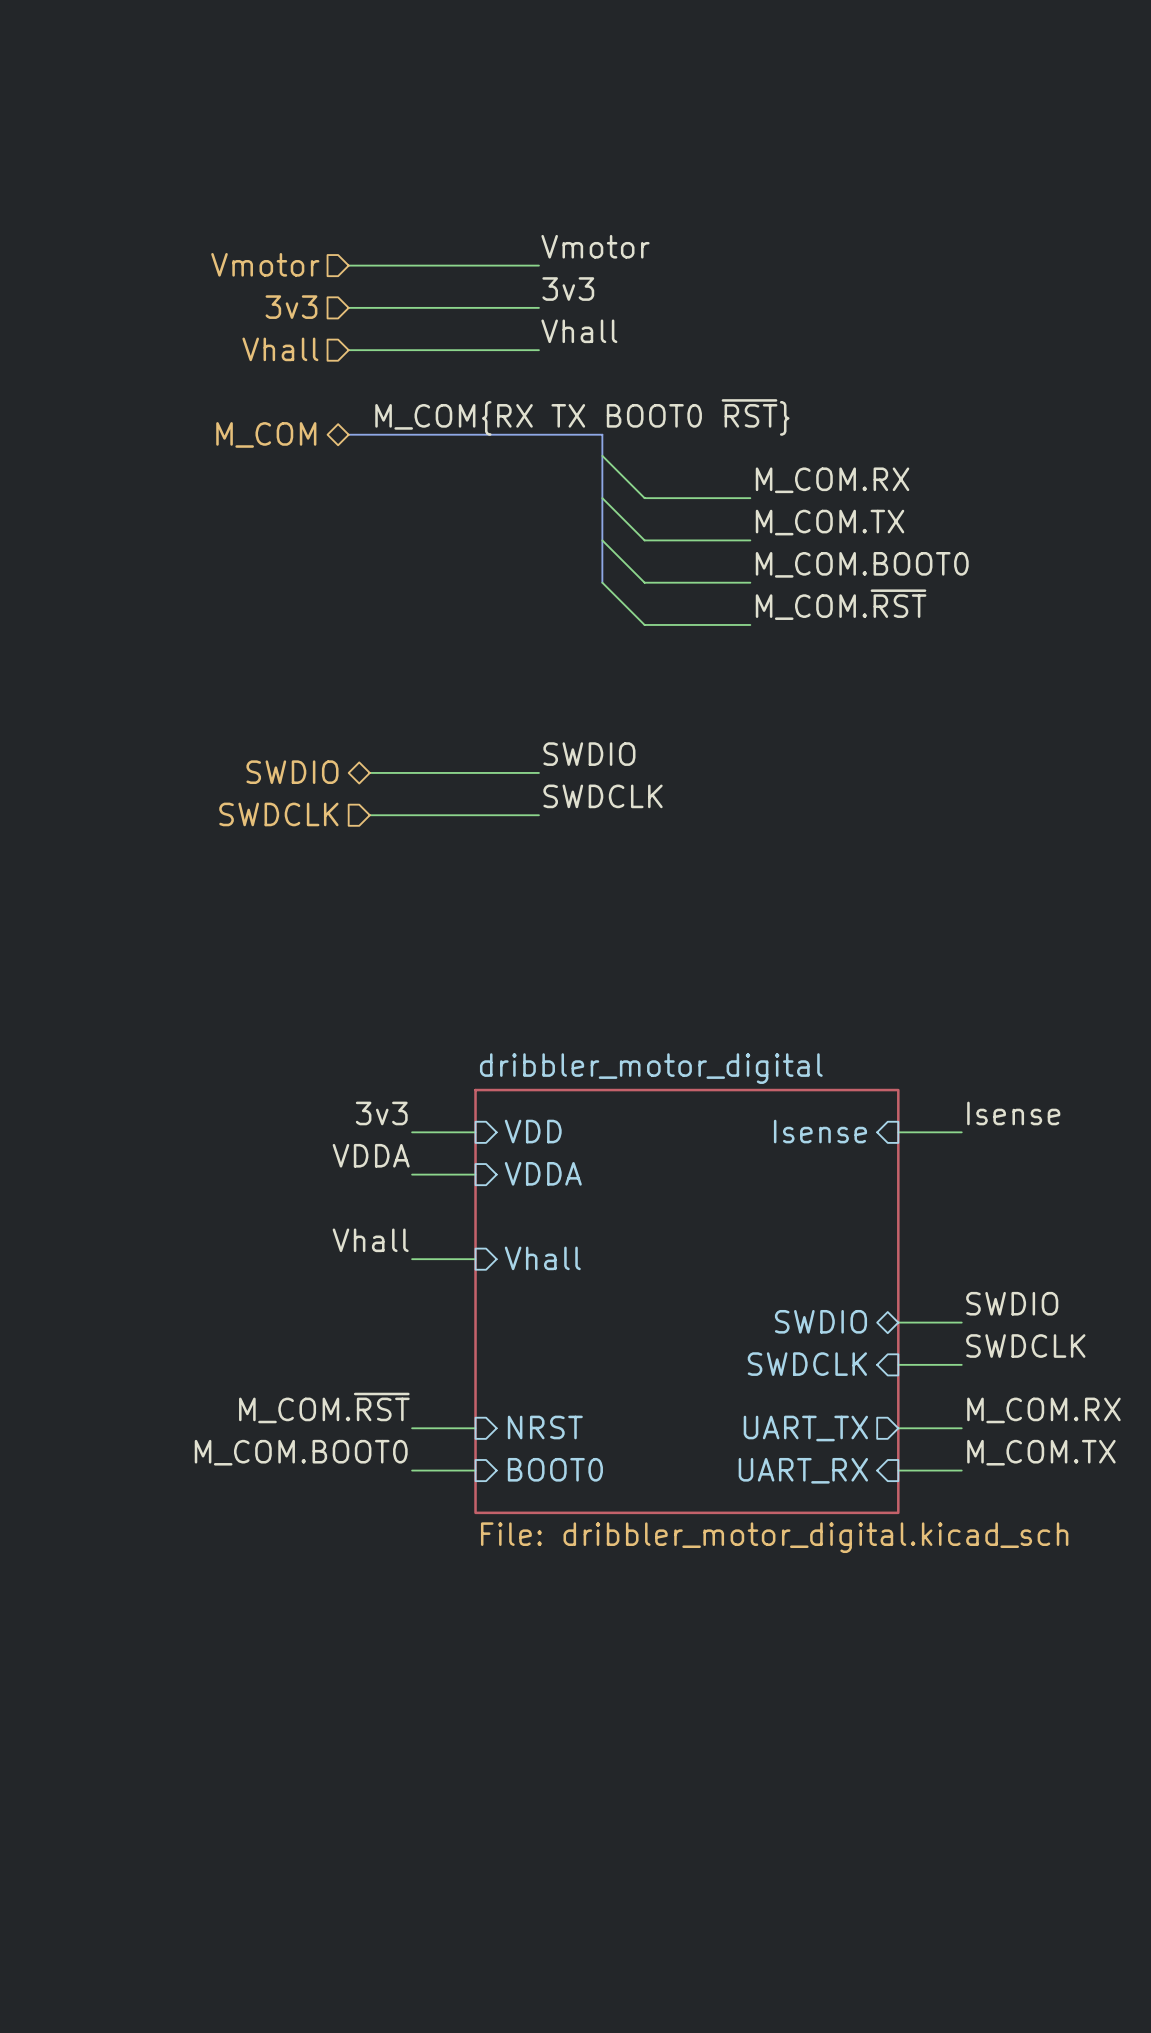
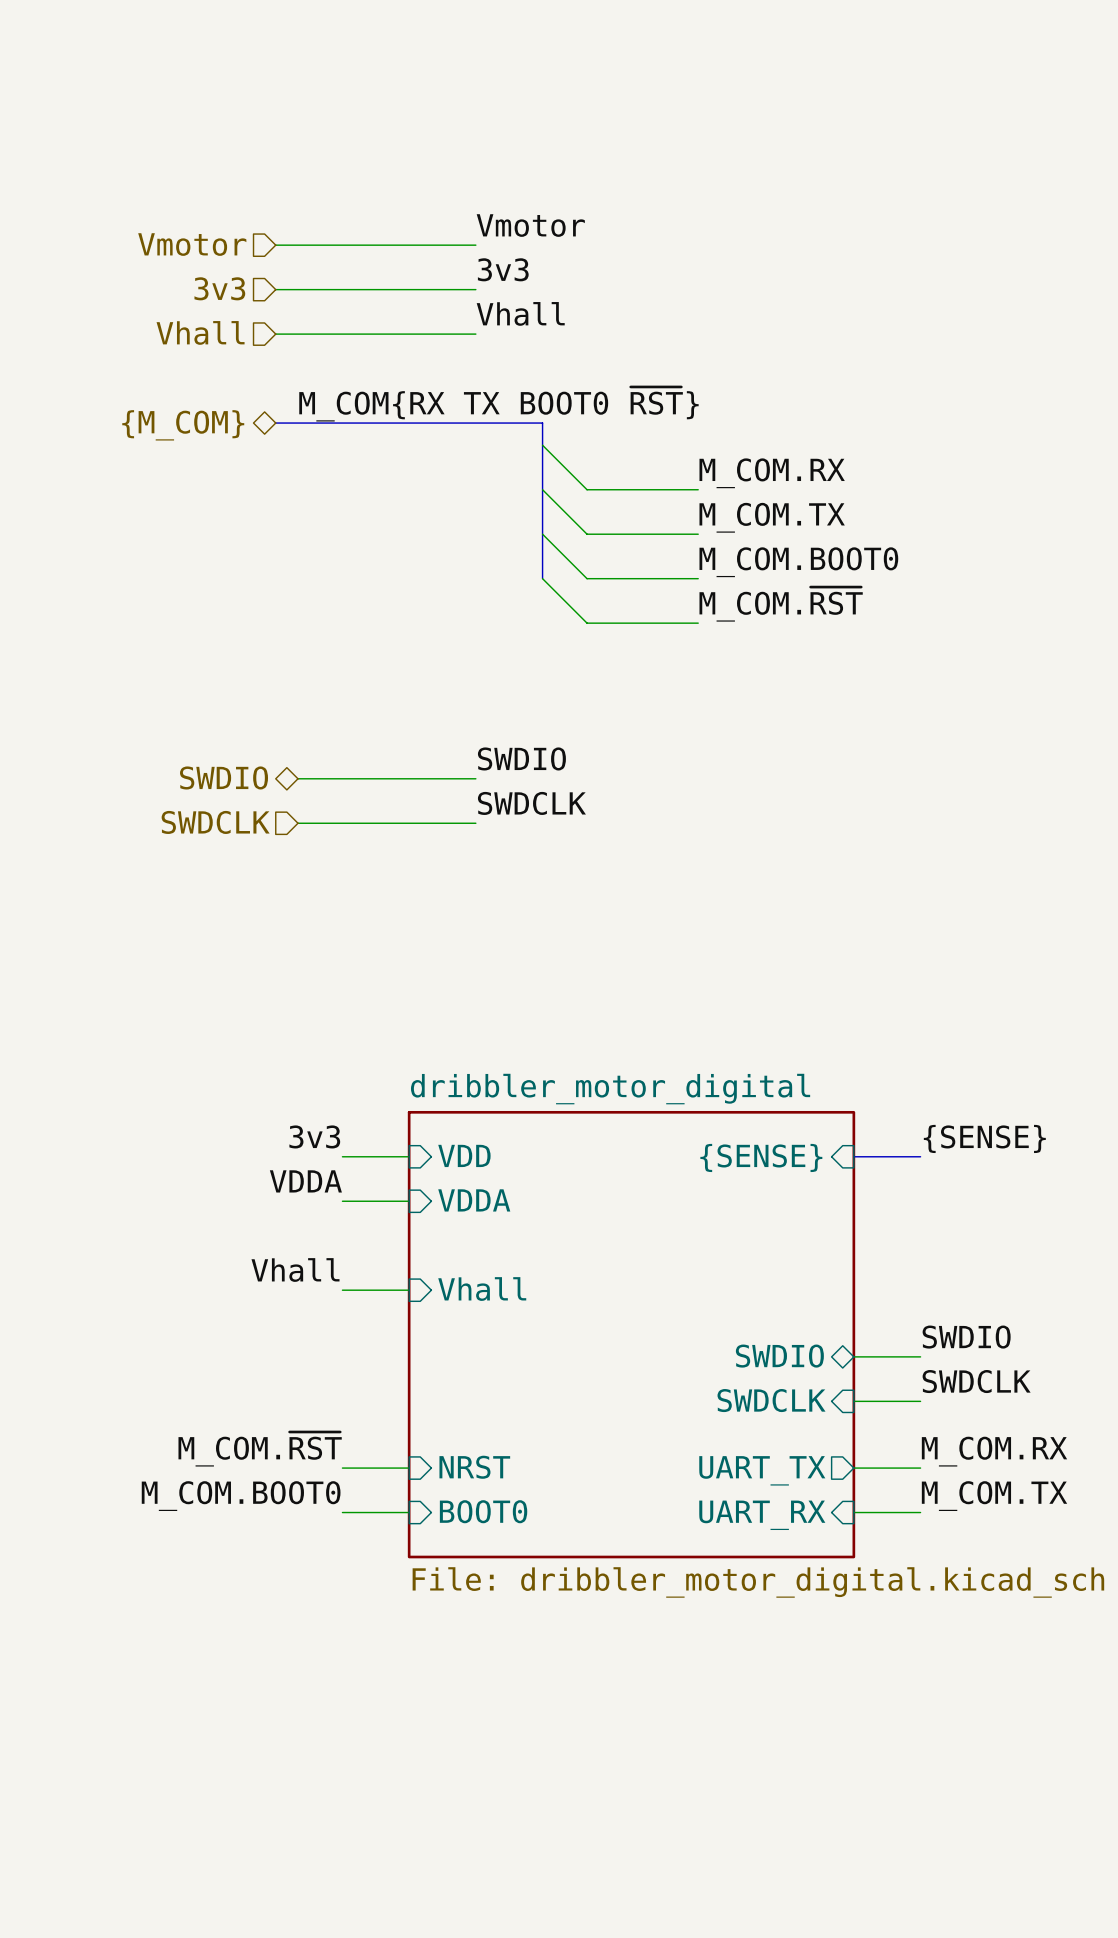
hierarchical label: M_COM (266, 434) -> {M_COM} (183, 425)
label: Isense (1013, 1113) -> {SENSE} (984, 1138)
sheet pin: Isense (820, 1131) -> {SENSE} (761, 1157)
bus: none -> (853, 1156) (920, 1156)

